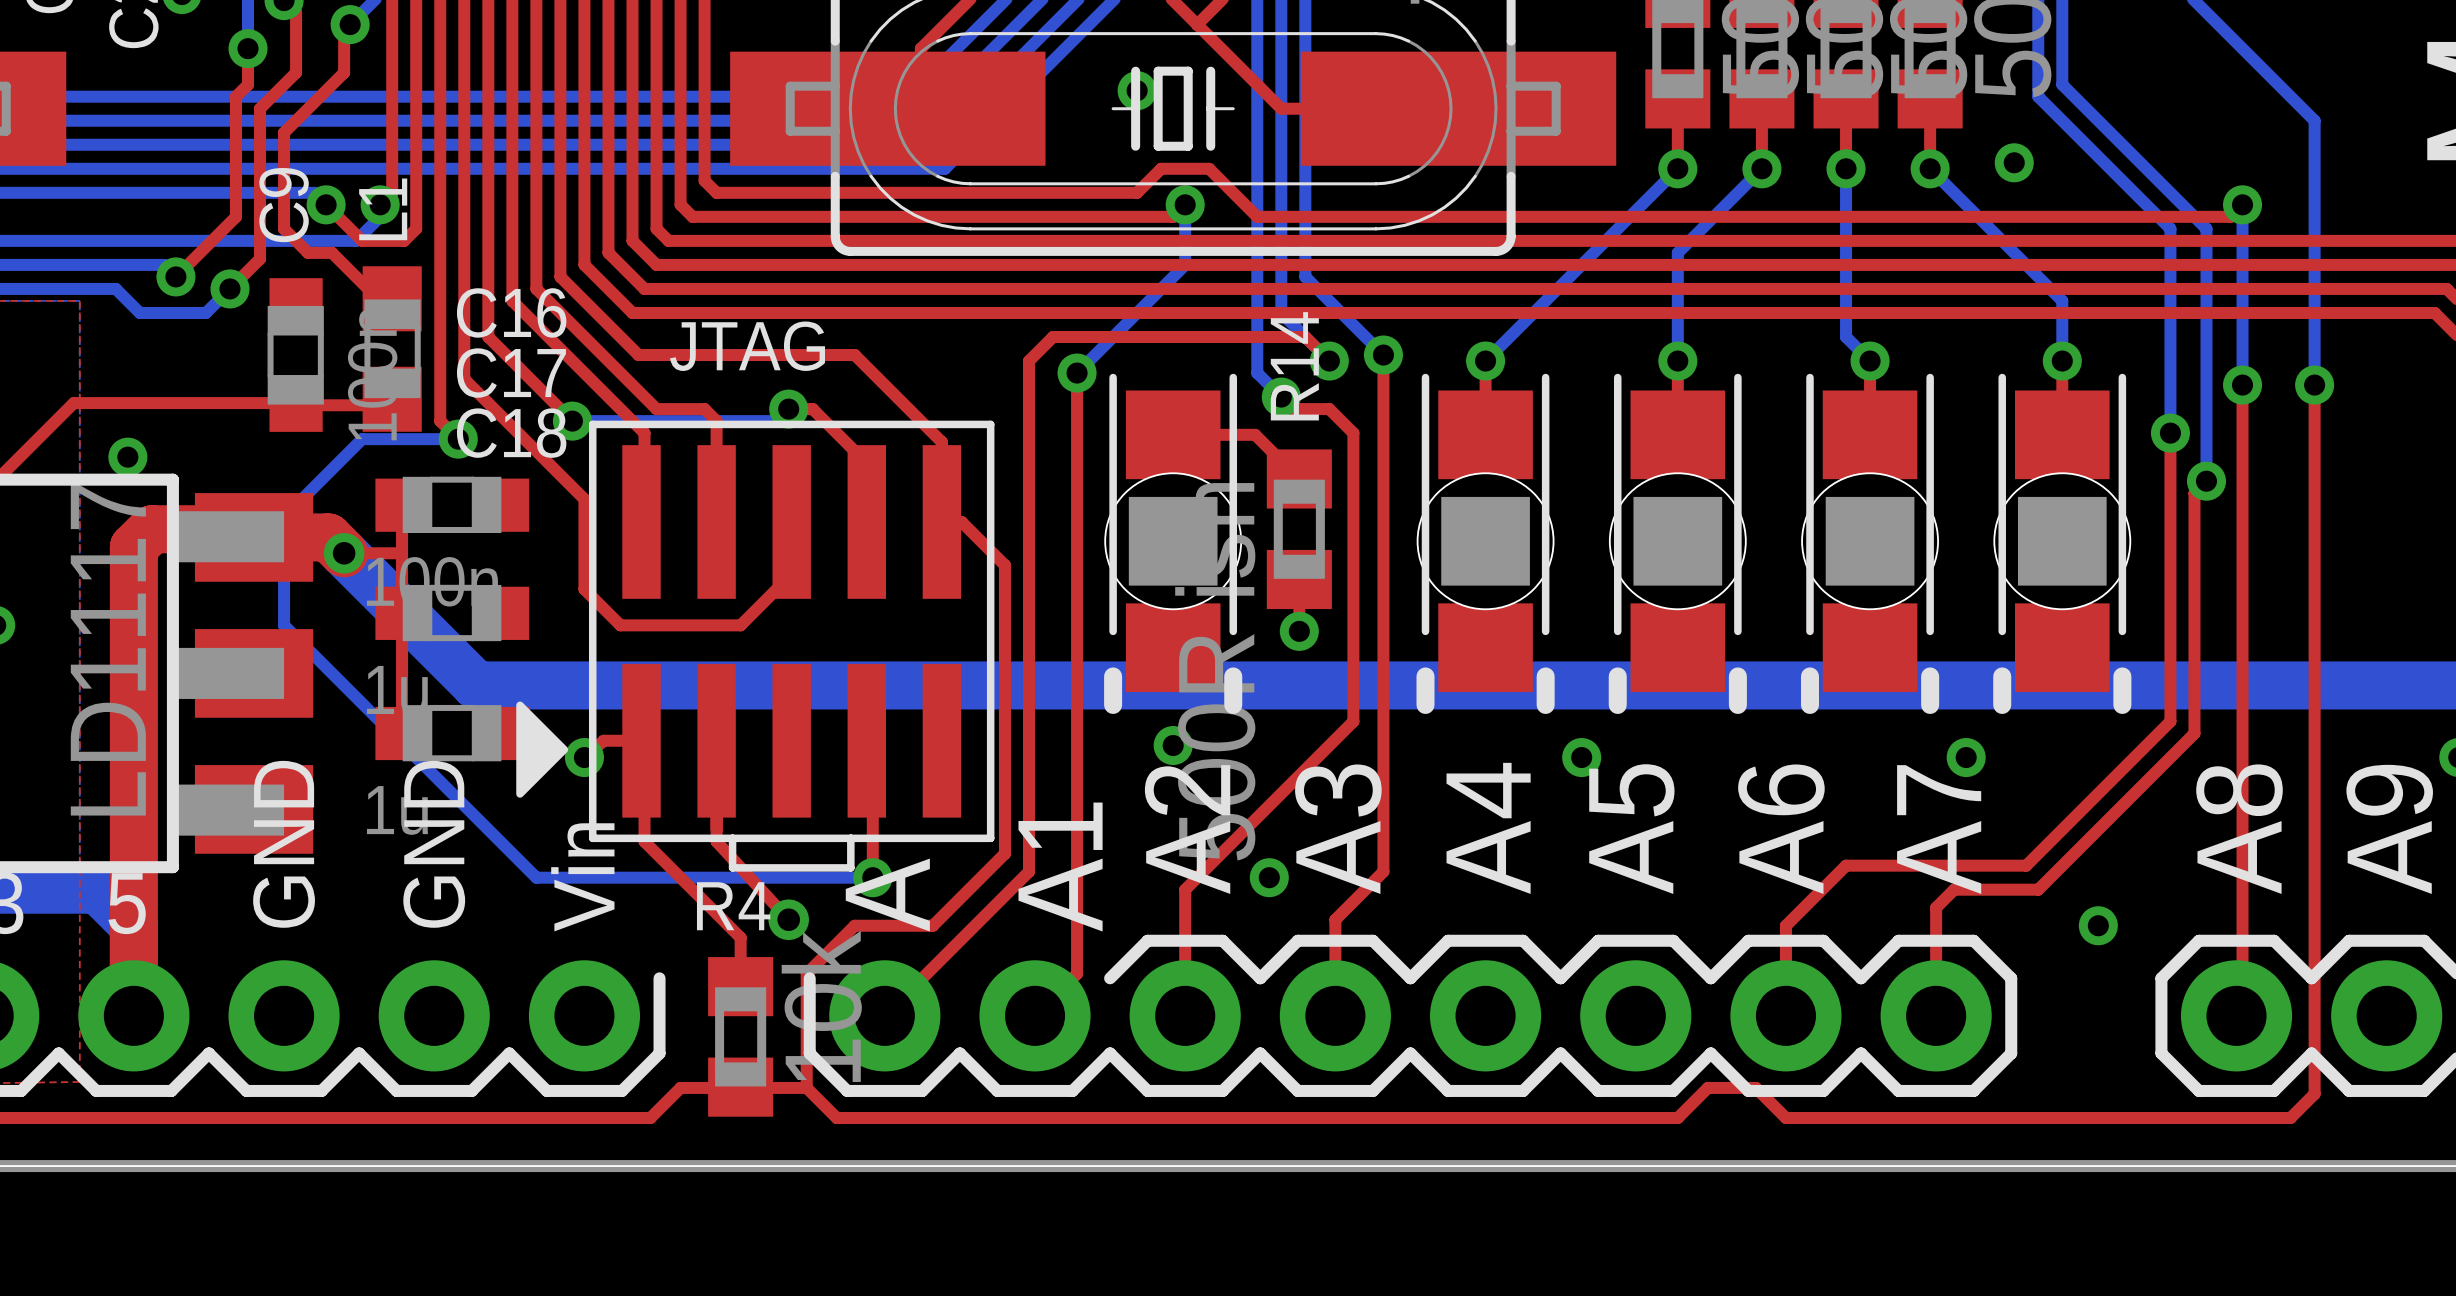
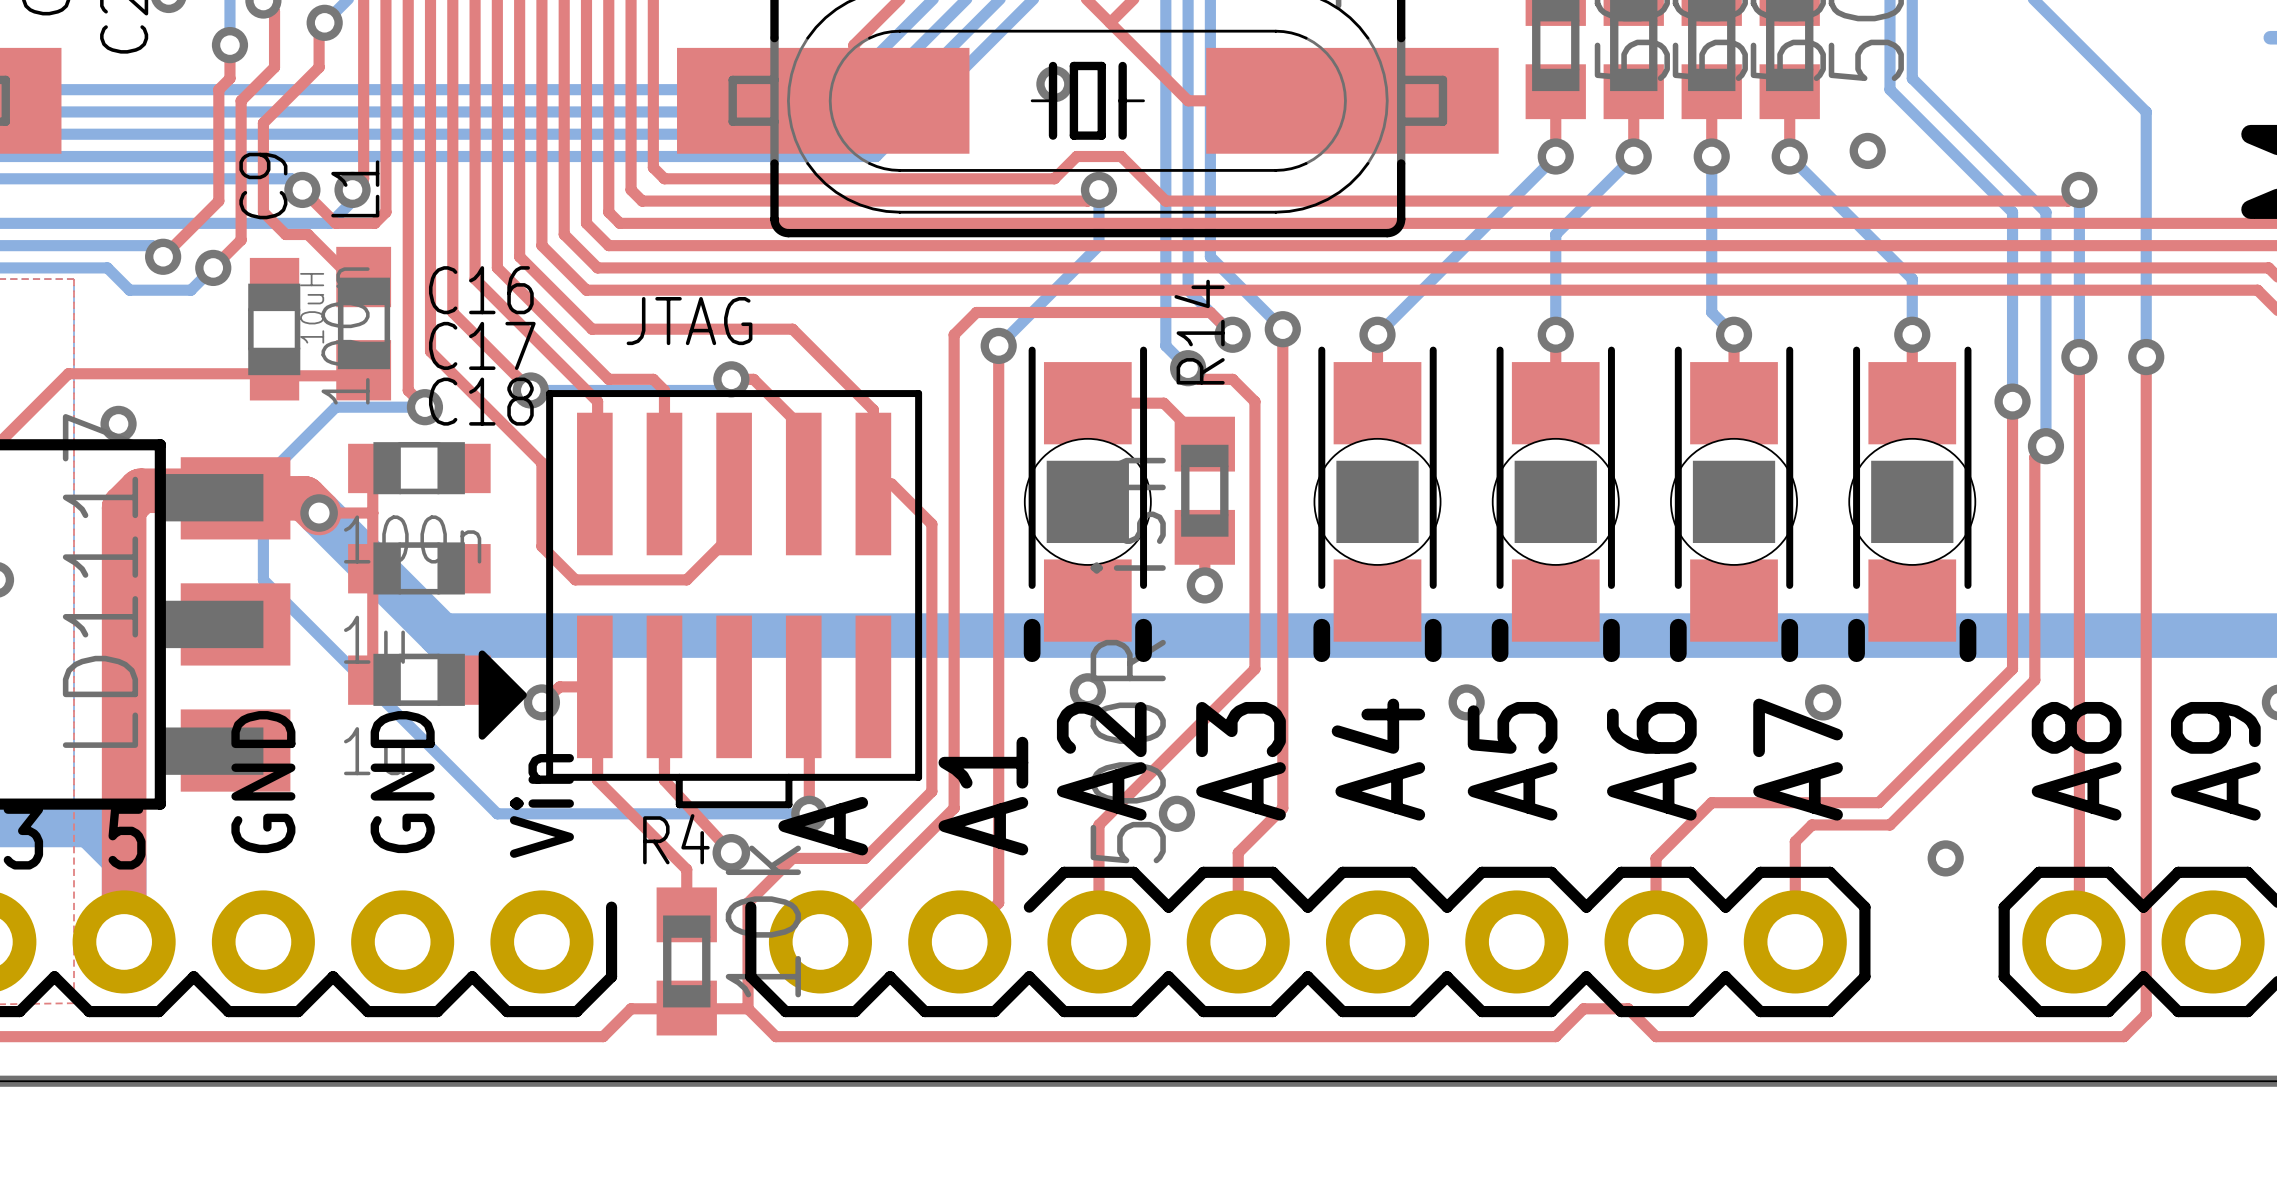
L1 value: none -> 10uH (312, 308)

